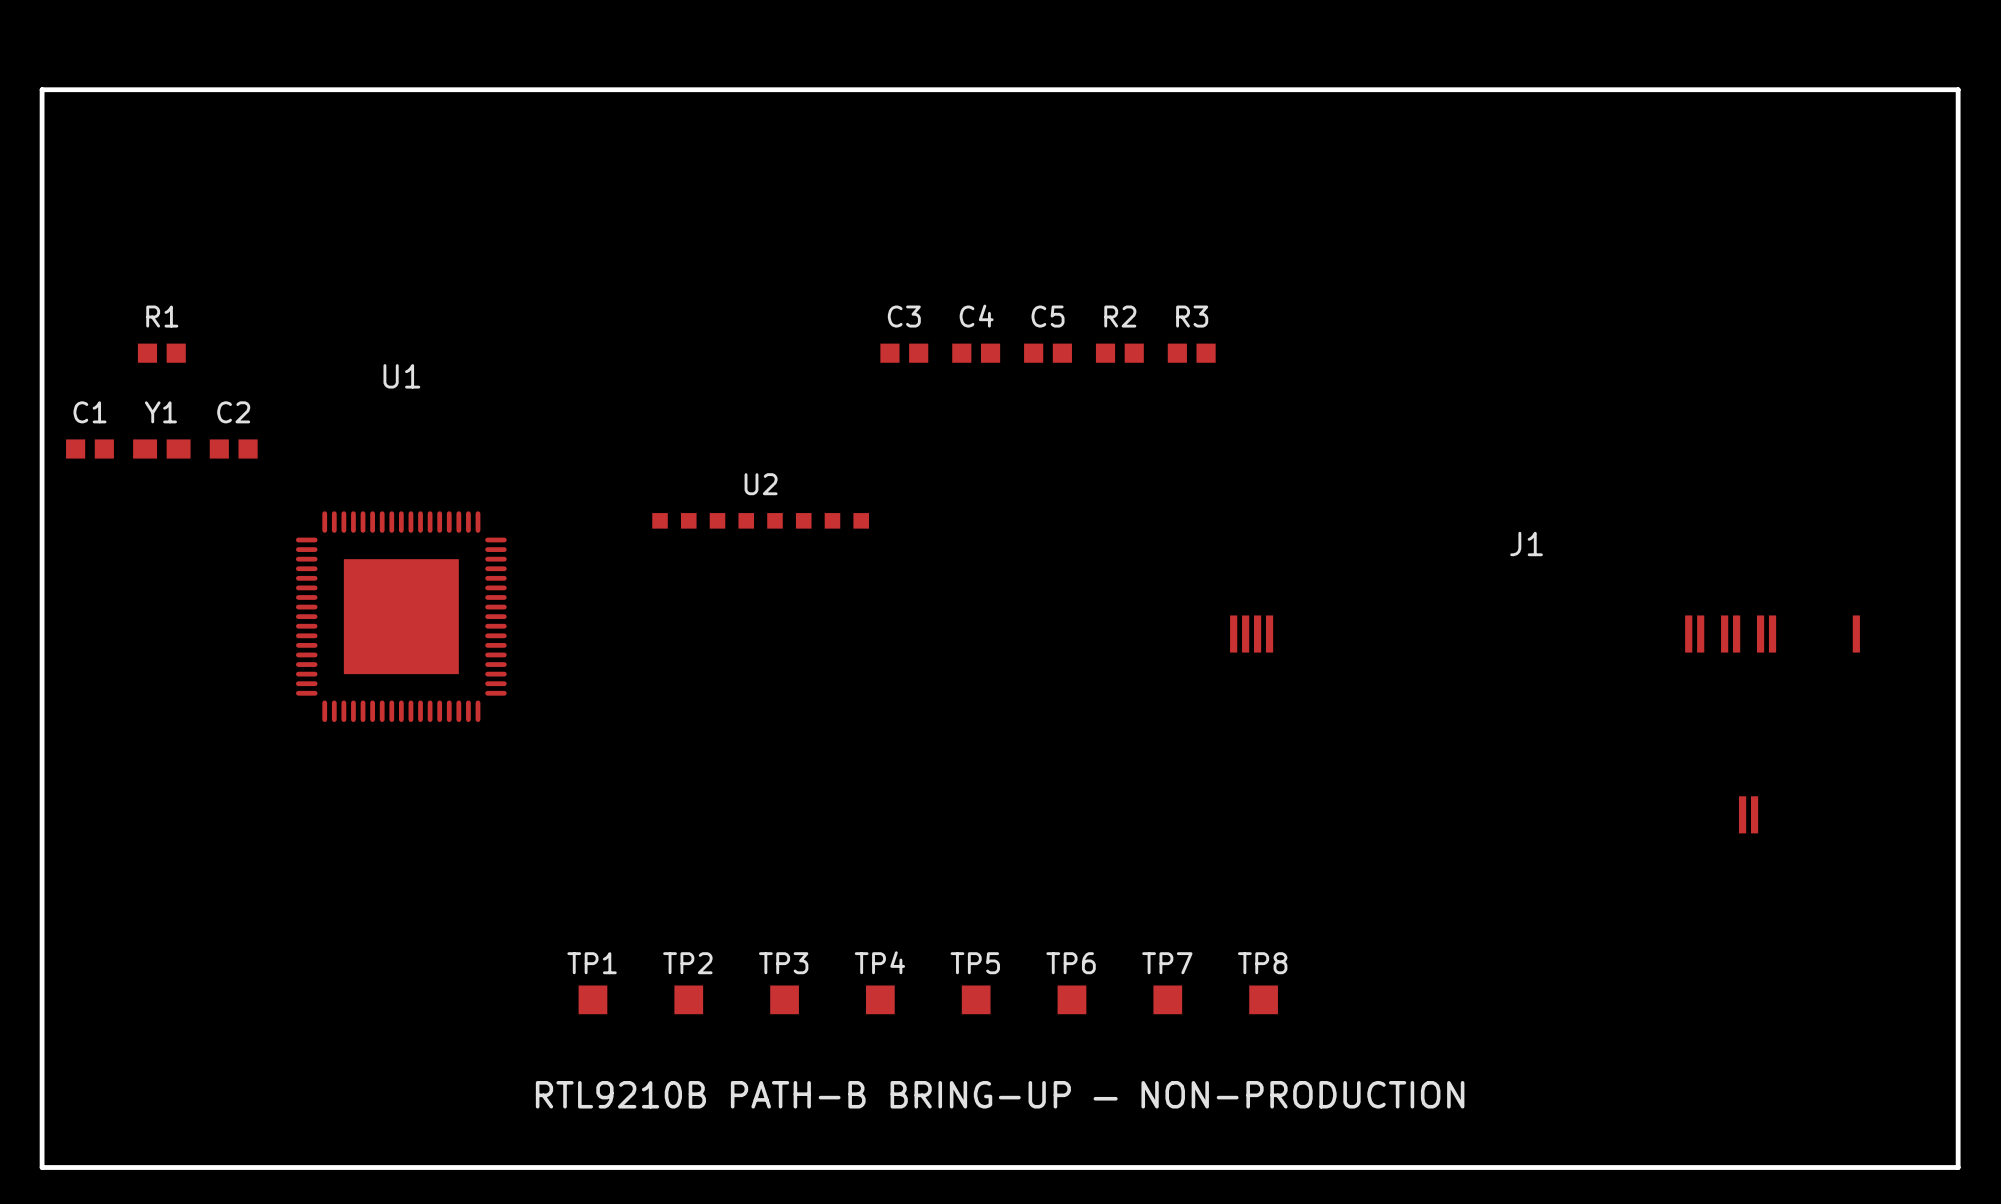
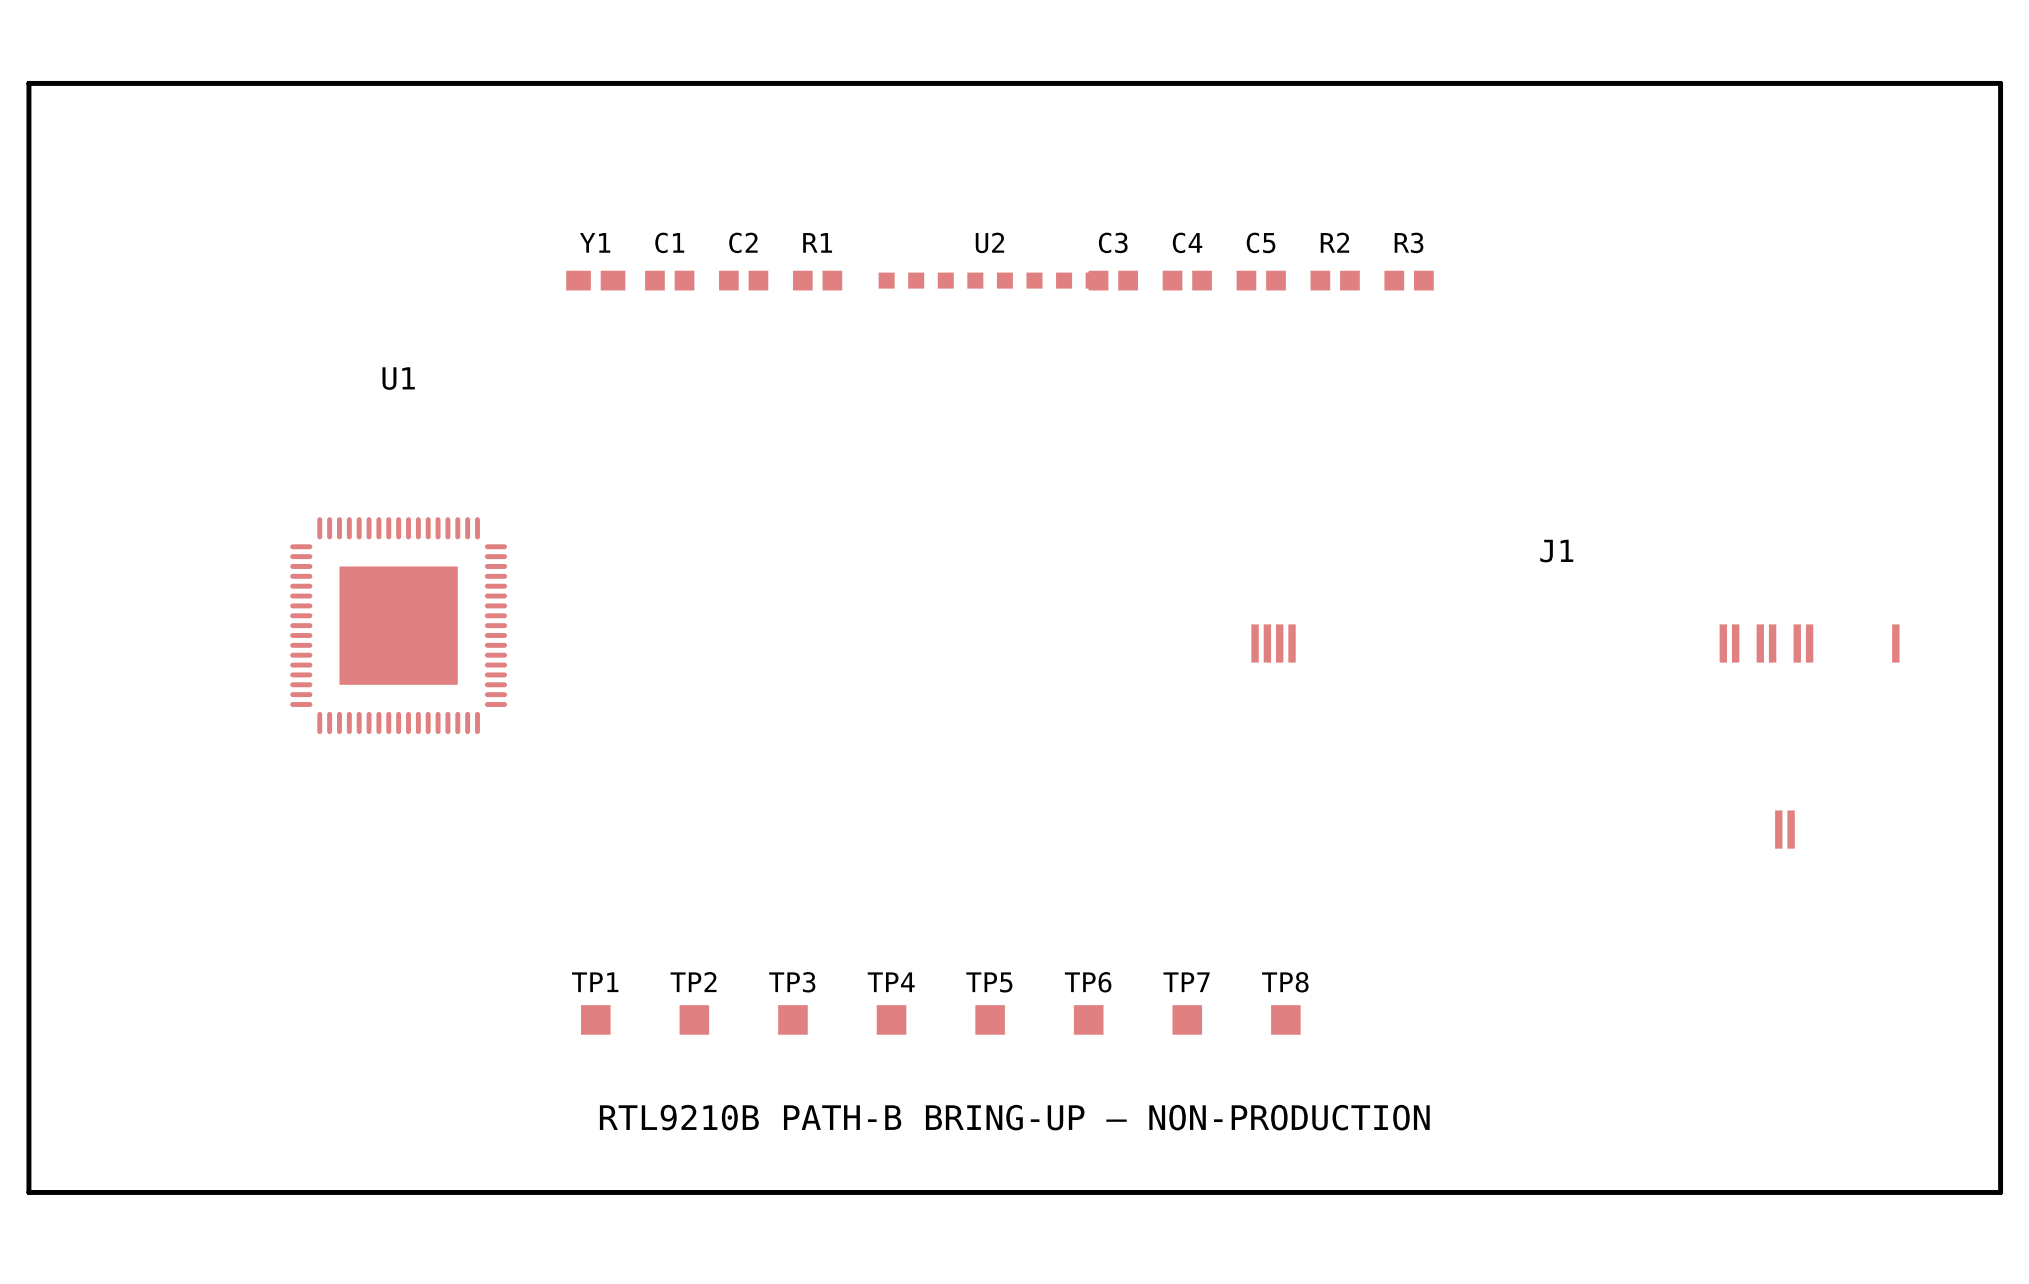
R1 position: (161, 353) -> (817, 280)
C3 position: (904, 353) -> (1113, 280)
C4 position: (976, 353) -> (1187, 280)
C5 position: (1048, 353) -> (1261, 280)
R2 position: (1119, 353) -> (1335, 280)
R3 position: (1191, 353) -> (1409, 280)
C1 position: (89, 448) -> (669, 280)
Y1 position: (161, 448) -> (595, 280)
C2 position: (233, 448) -> (743, 280)
U2 position: (760, 520) -> (990, 280)

